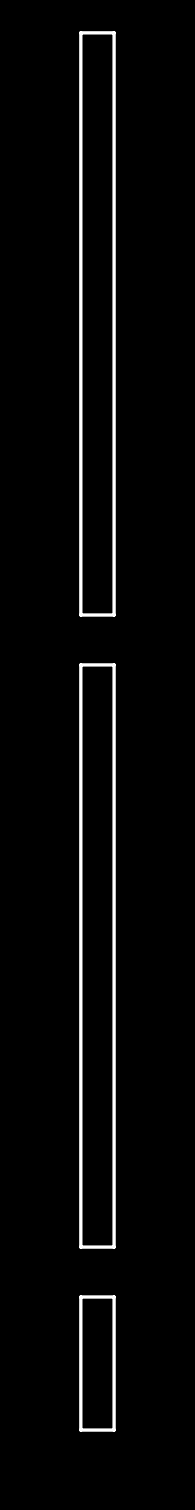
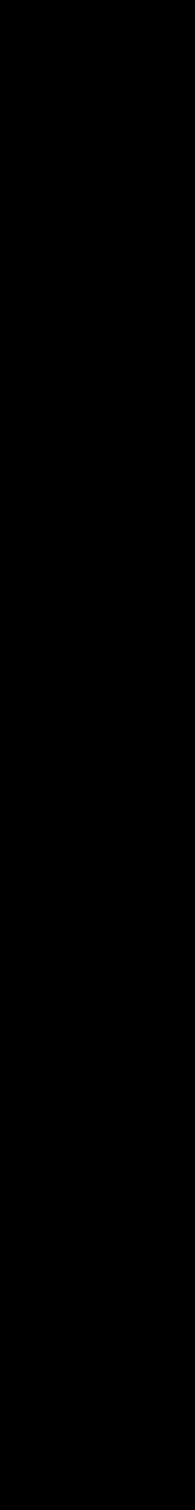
board edge: (80, 32) (80, 615) (114, 615) (114, 32) (80, 32) -> none
board edge: (80, 664) (80, 1247) (114, 1247) (114, 664) (80, 664) -> none
board edge: (80, 1296) (80, 1430) (114, 1430) (114, 1296) (80, 1296) -> none

